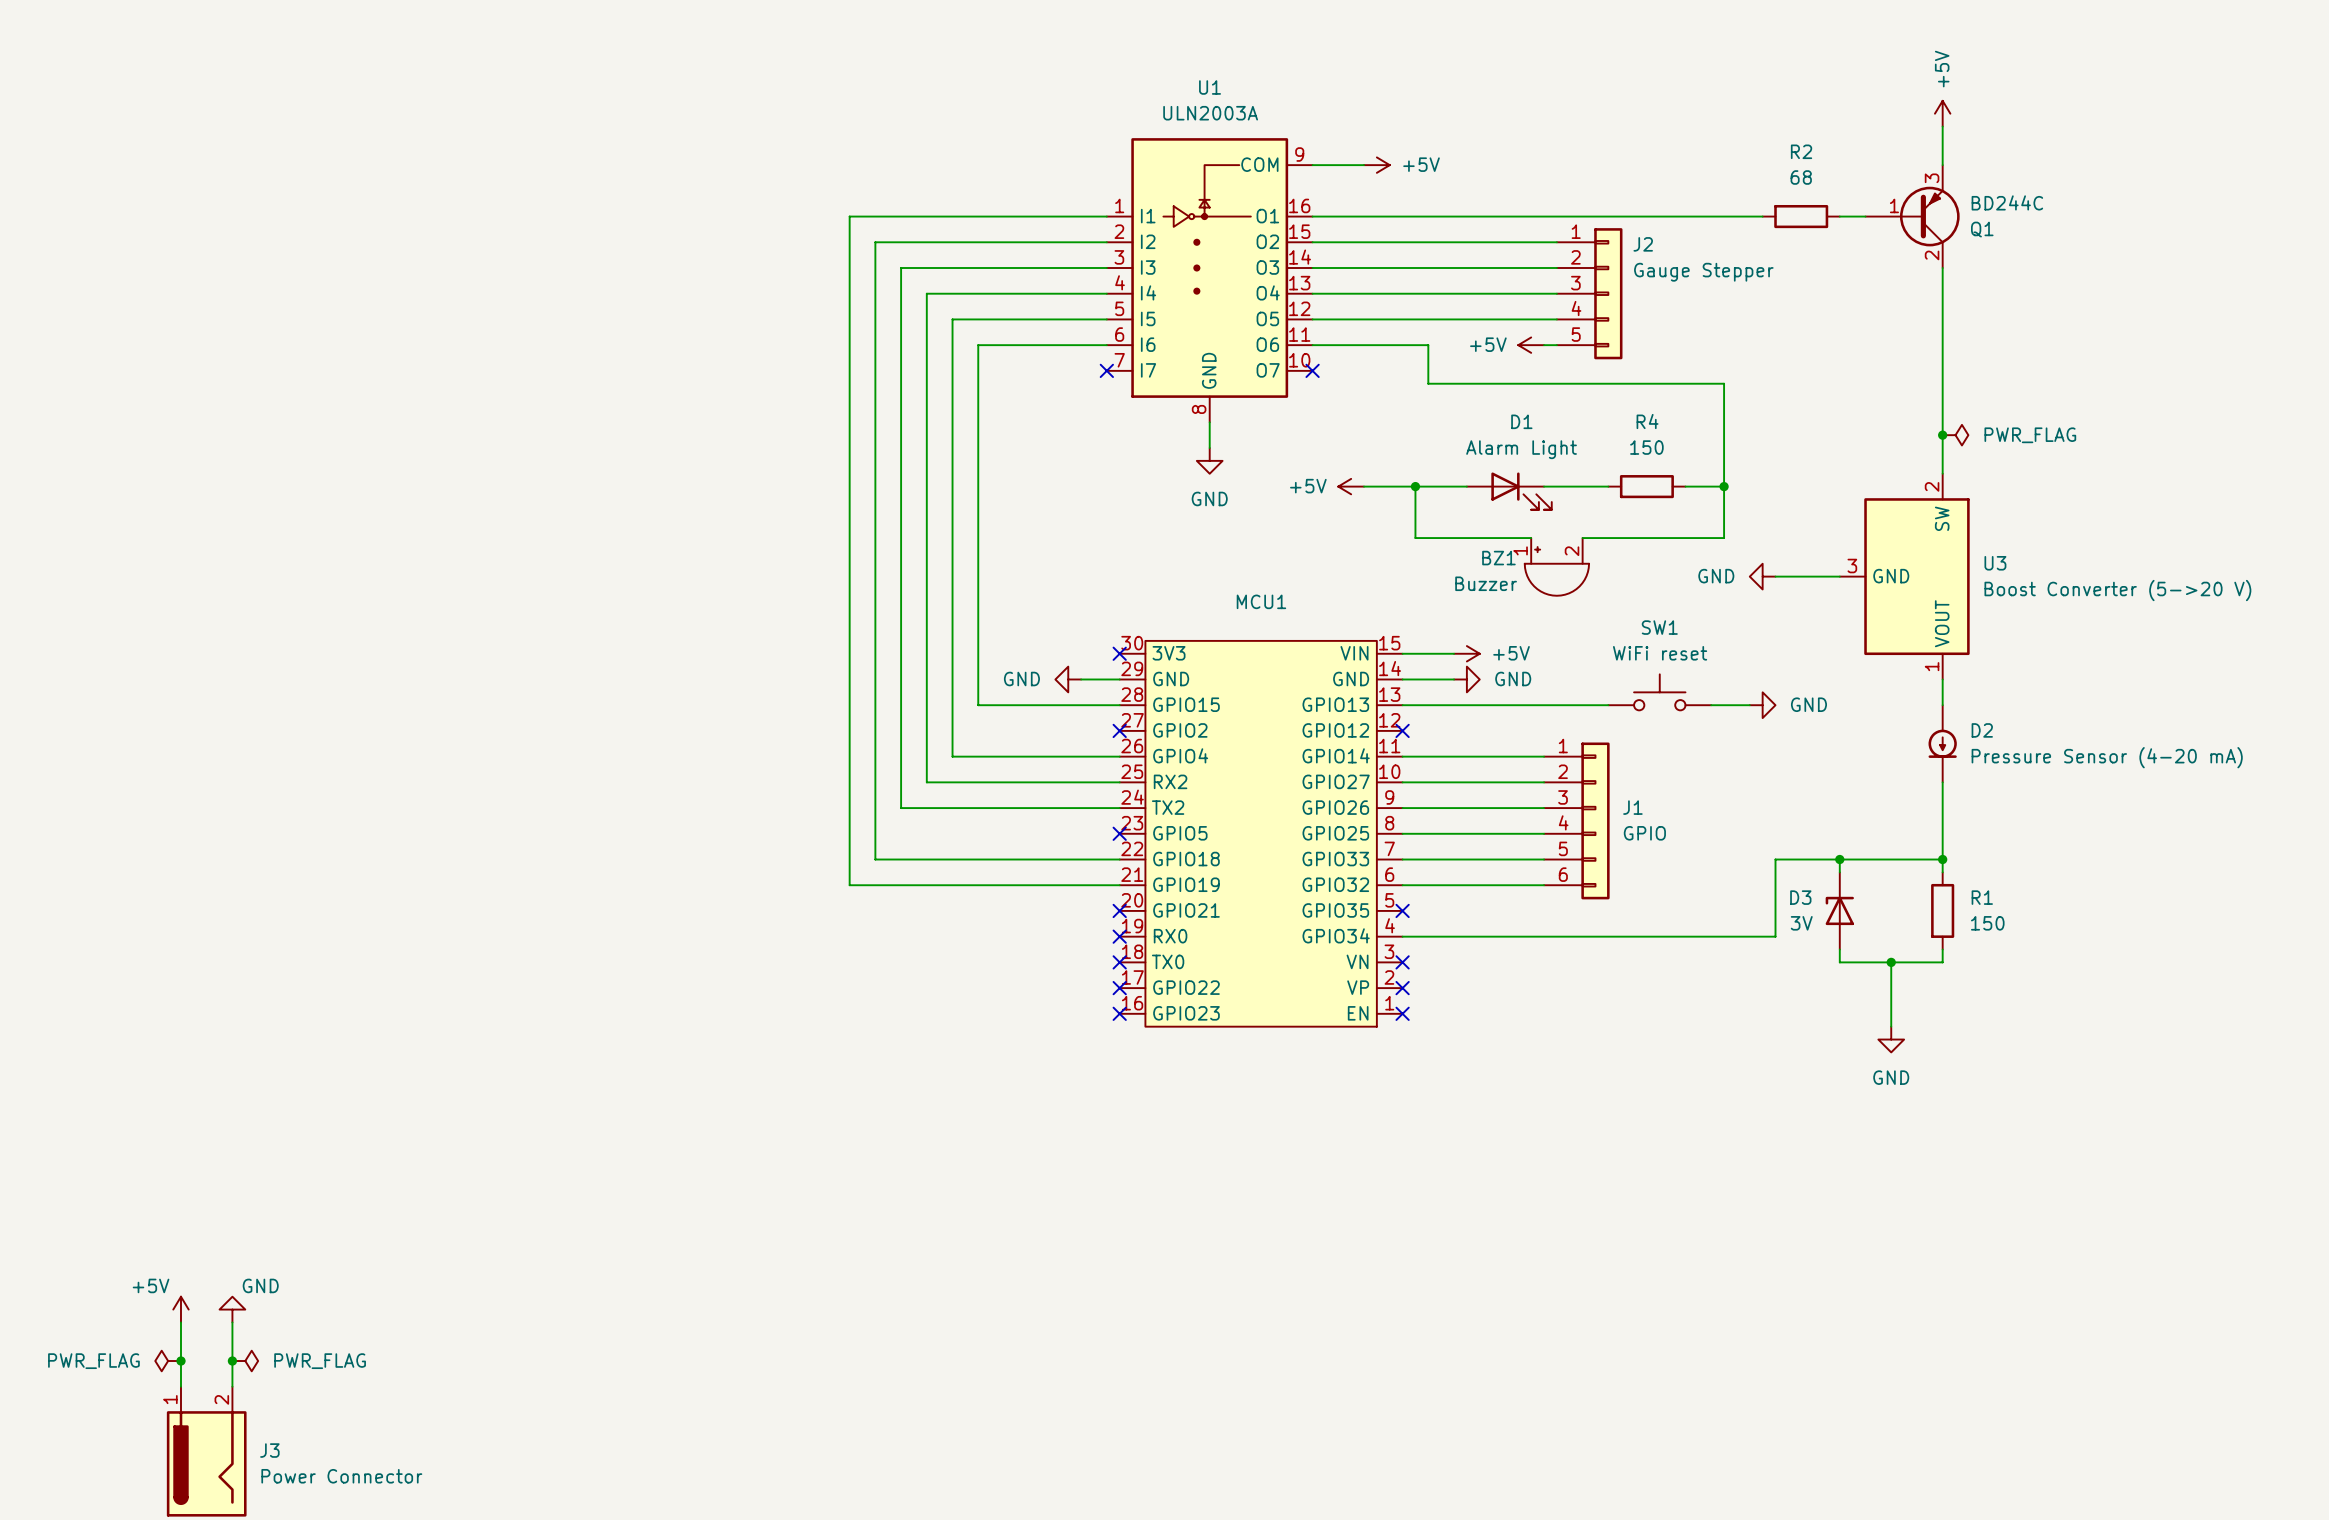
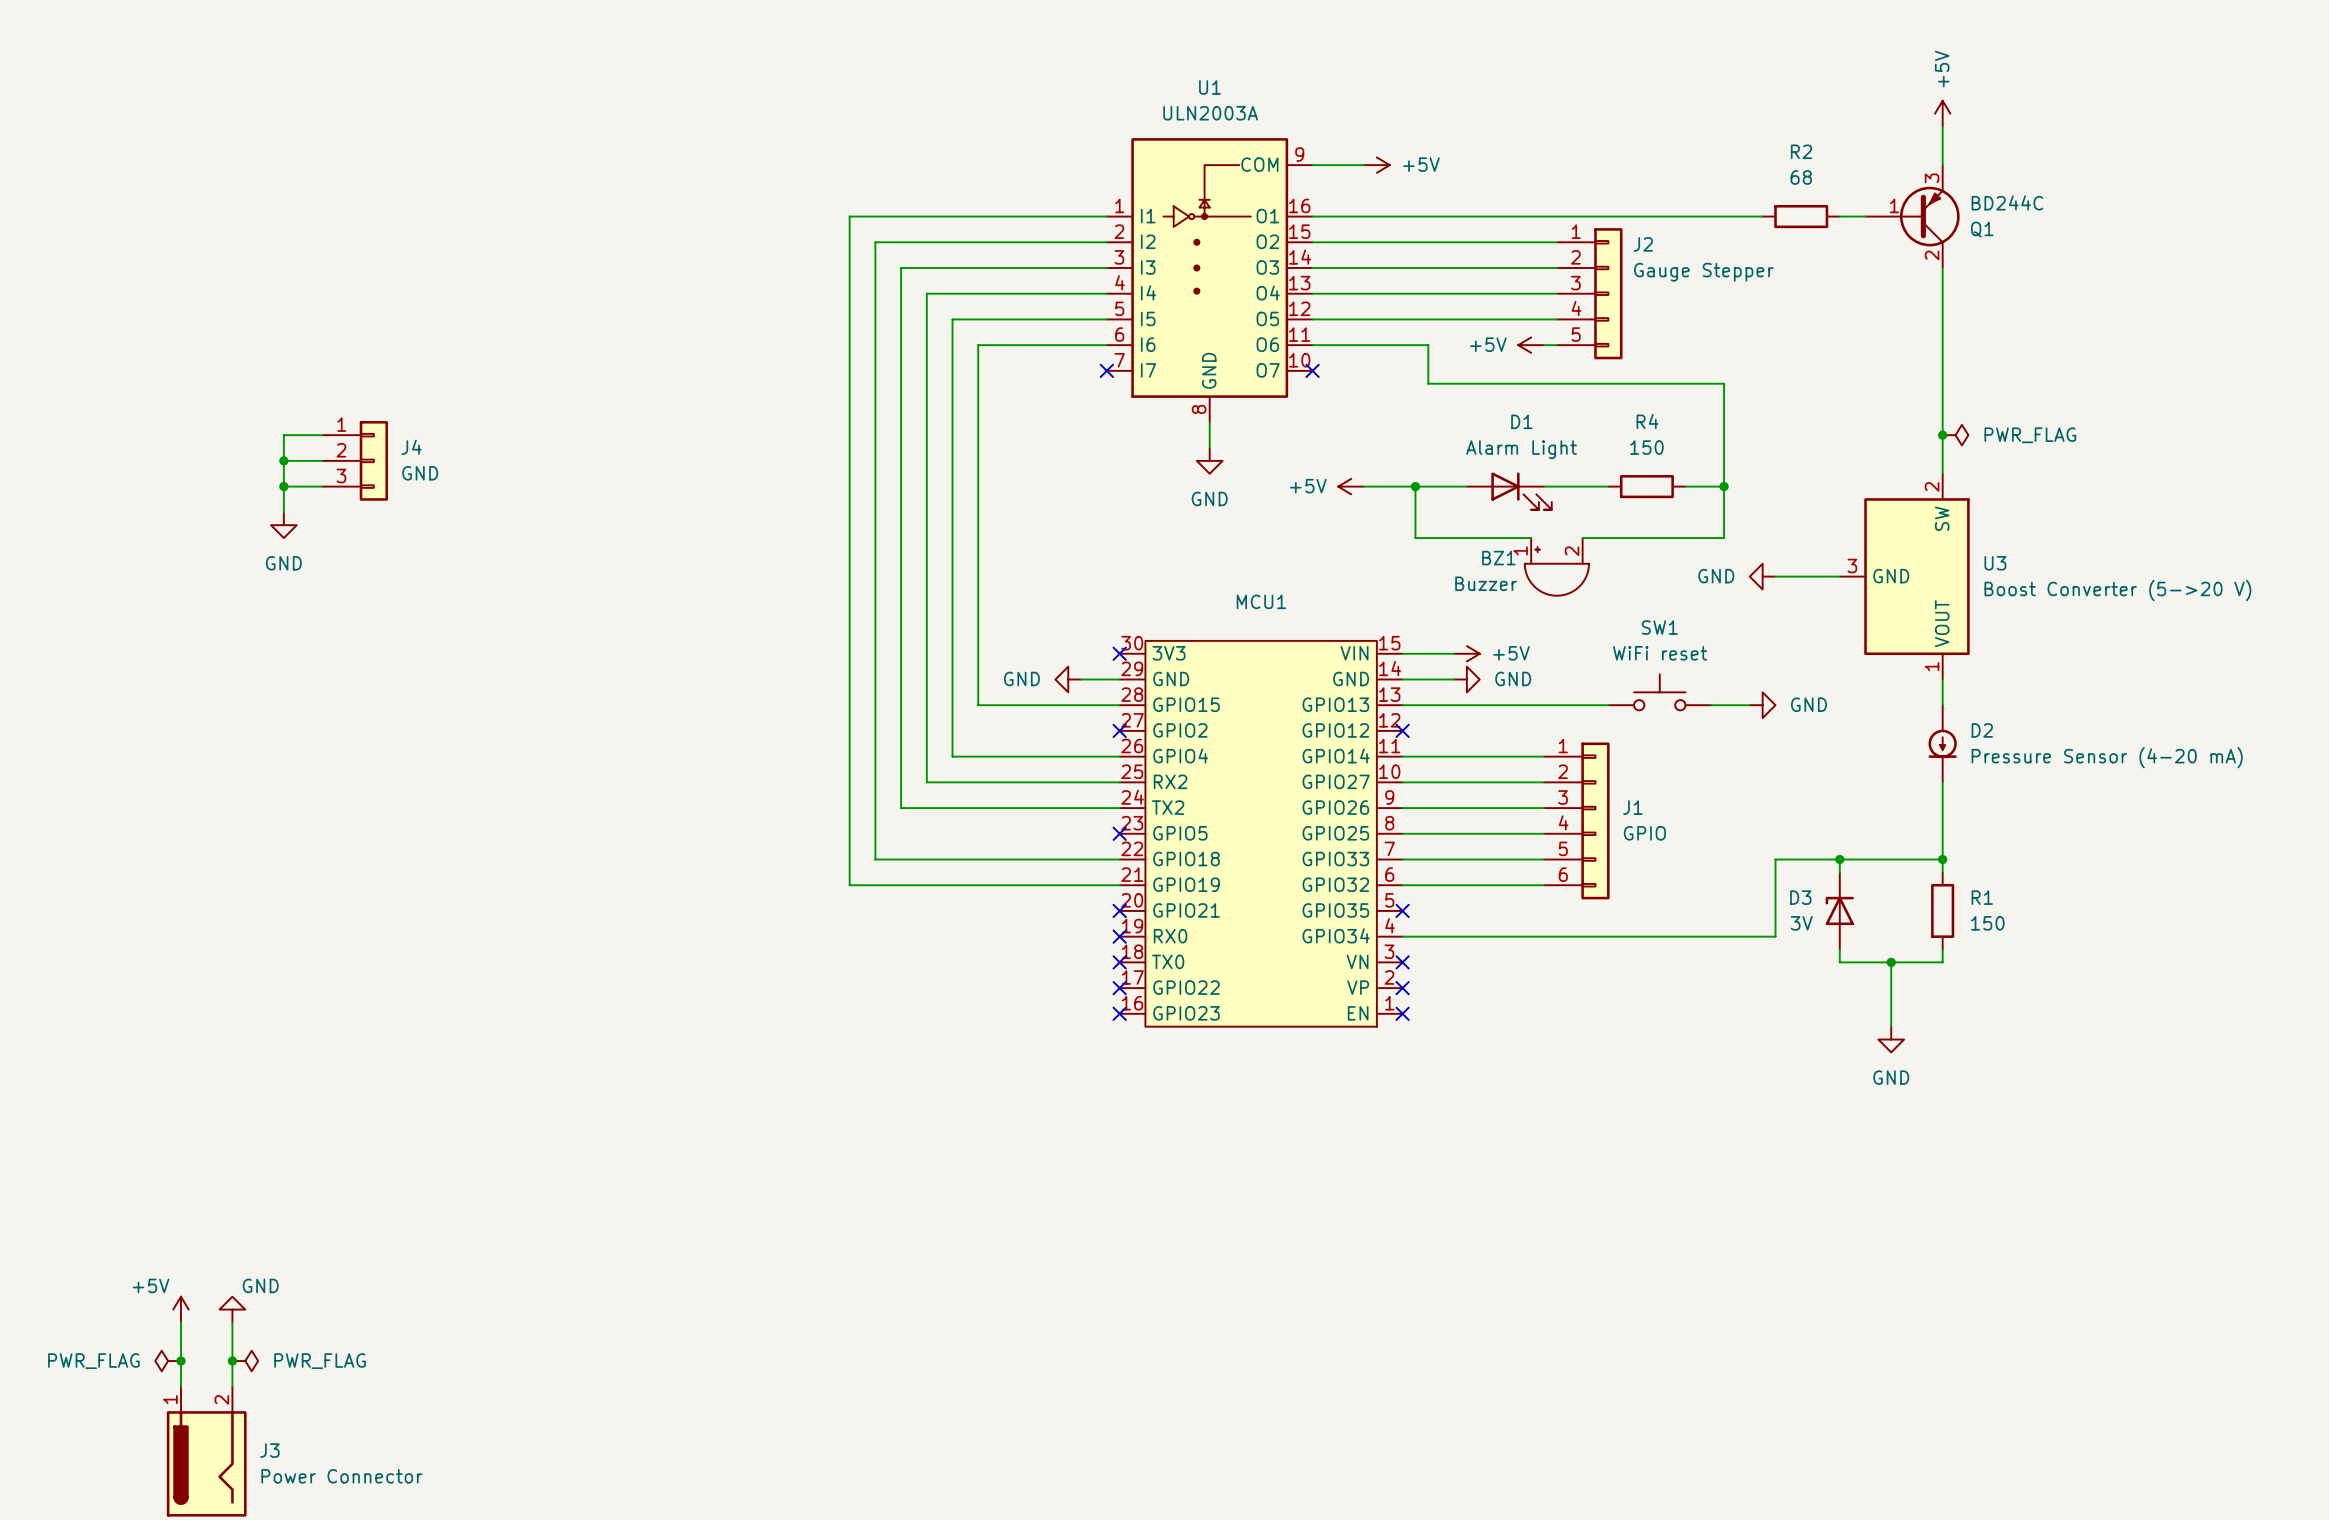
wire: none -> (322, 435) (283, 435) (283, 512)
wire: none -> (283, 460) (322, 460)
junction: none -> (283, 460)
J4: none -> GND (355, 460)
wire: none -> (283, 486) (322, 486)
junction: none -> (283, 486)
power symbol: none -> GND (283, 525)

